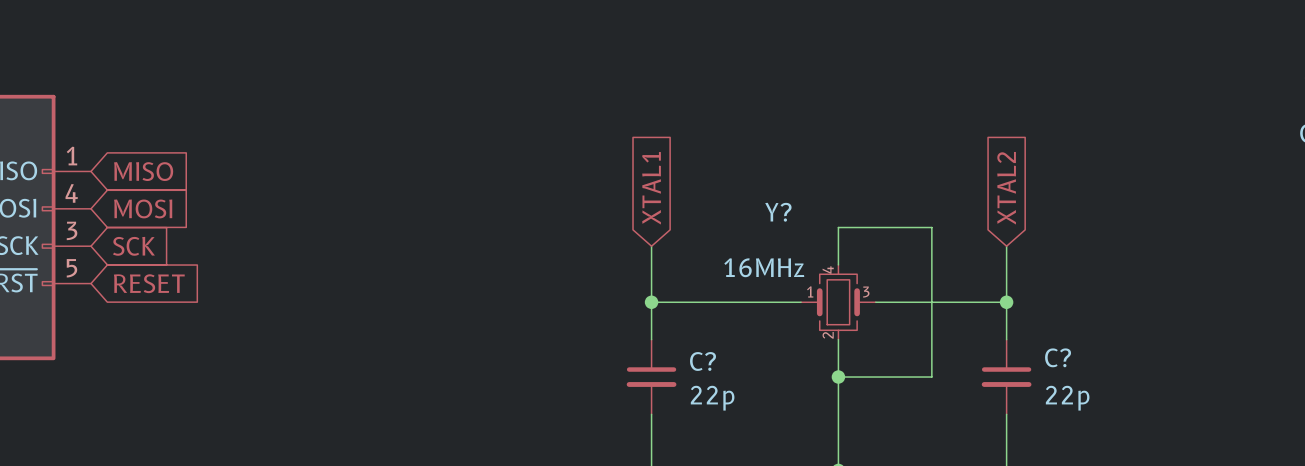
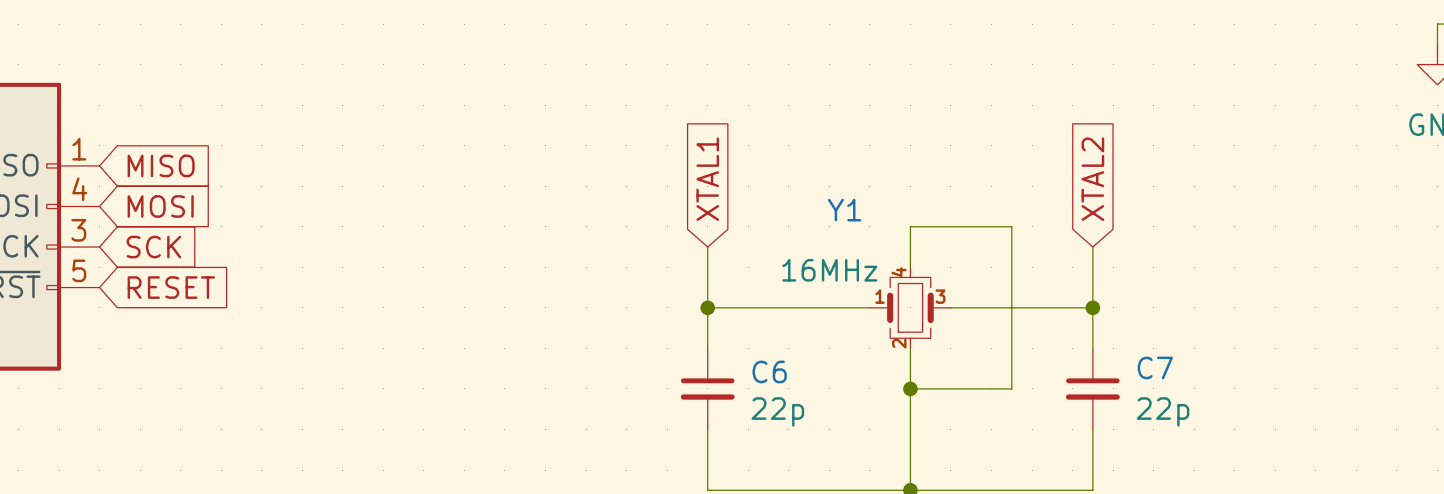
Y? name: Y? (778, 212) -> Y1 (844, 210)
C? name: C? (1058, 357) -> C7 (1155, 367)
C? name: C? (703, 361) -> C6 (769, 371)

